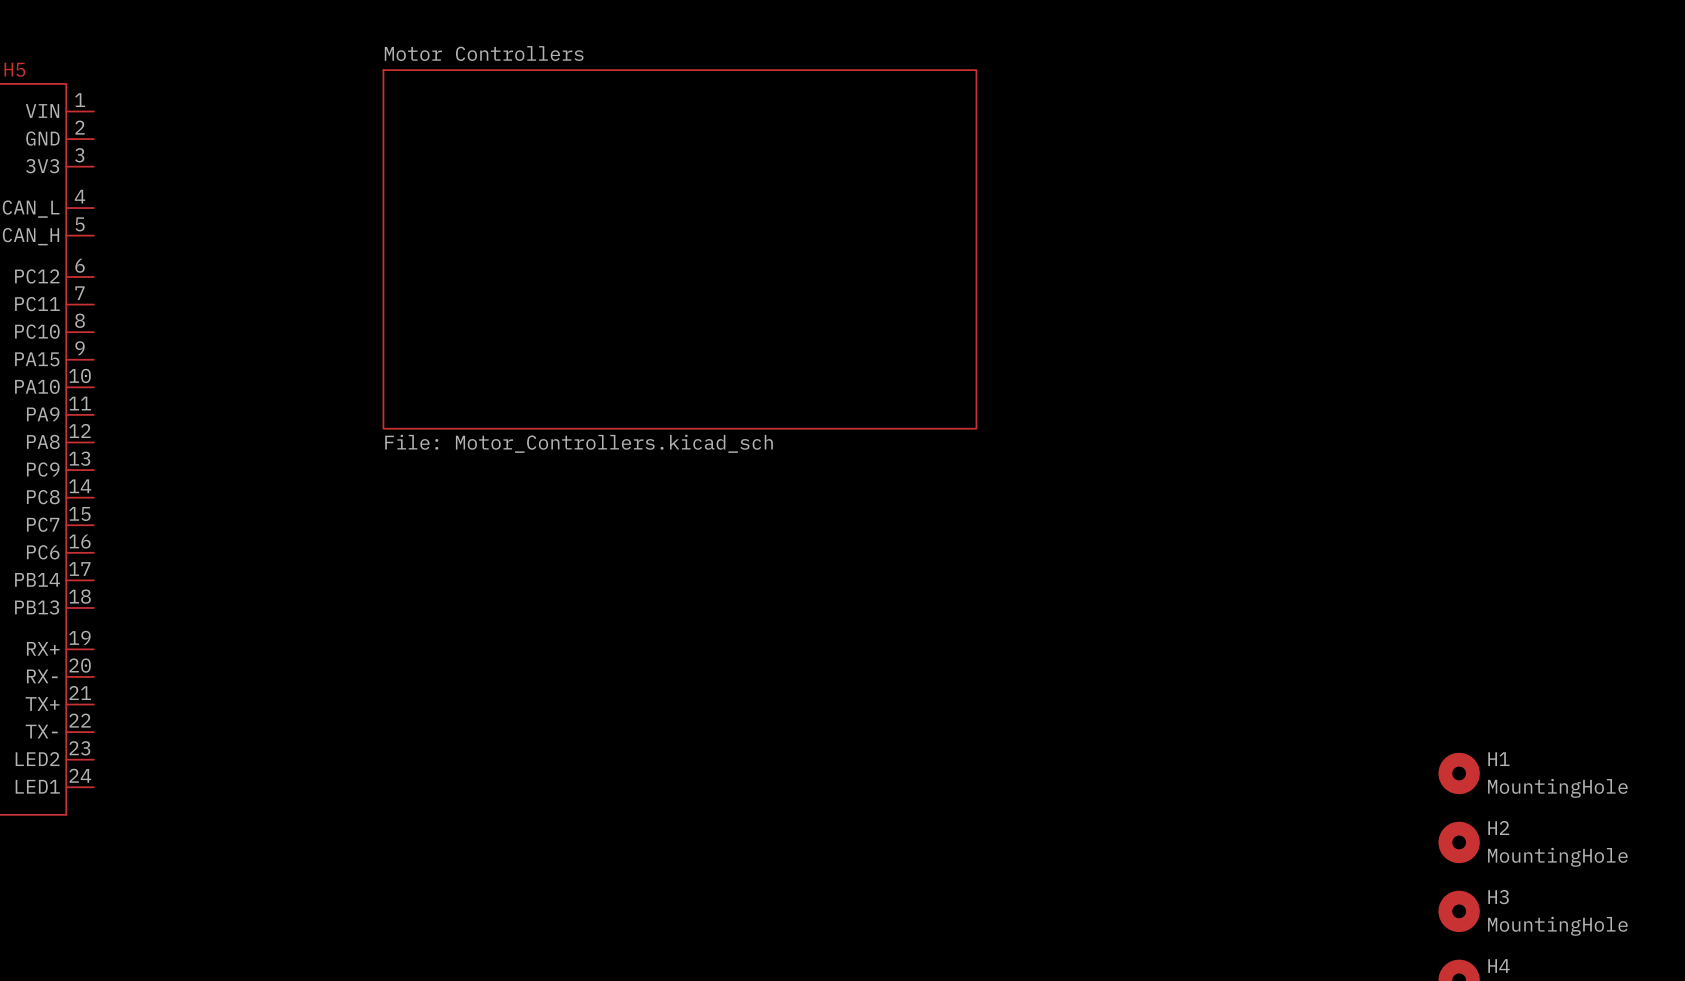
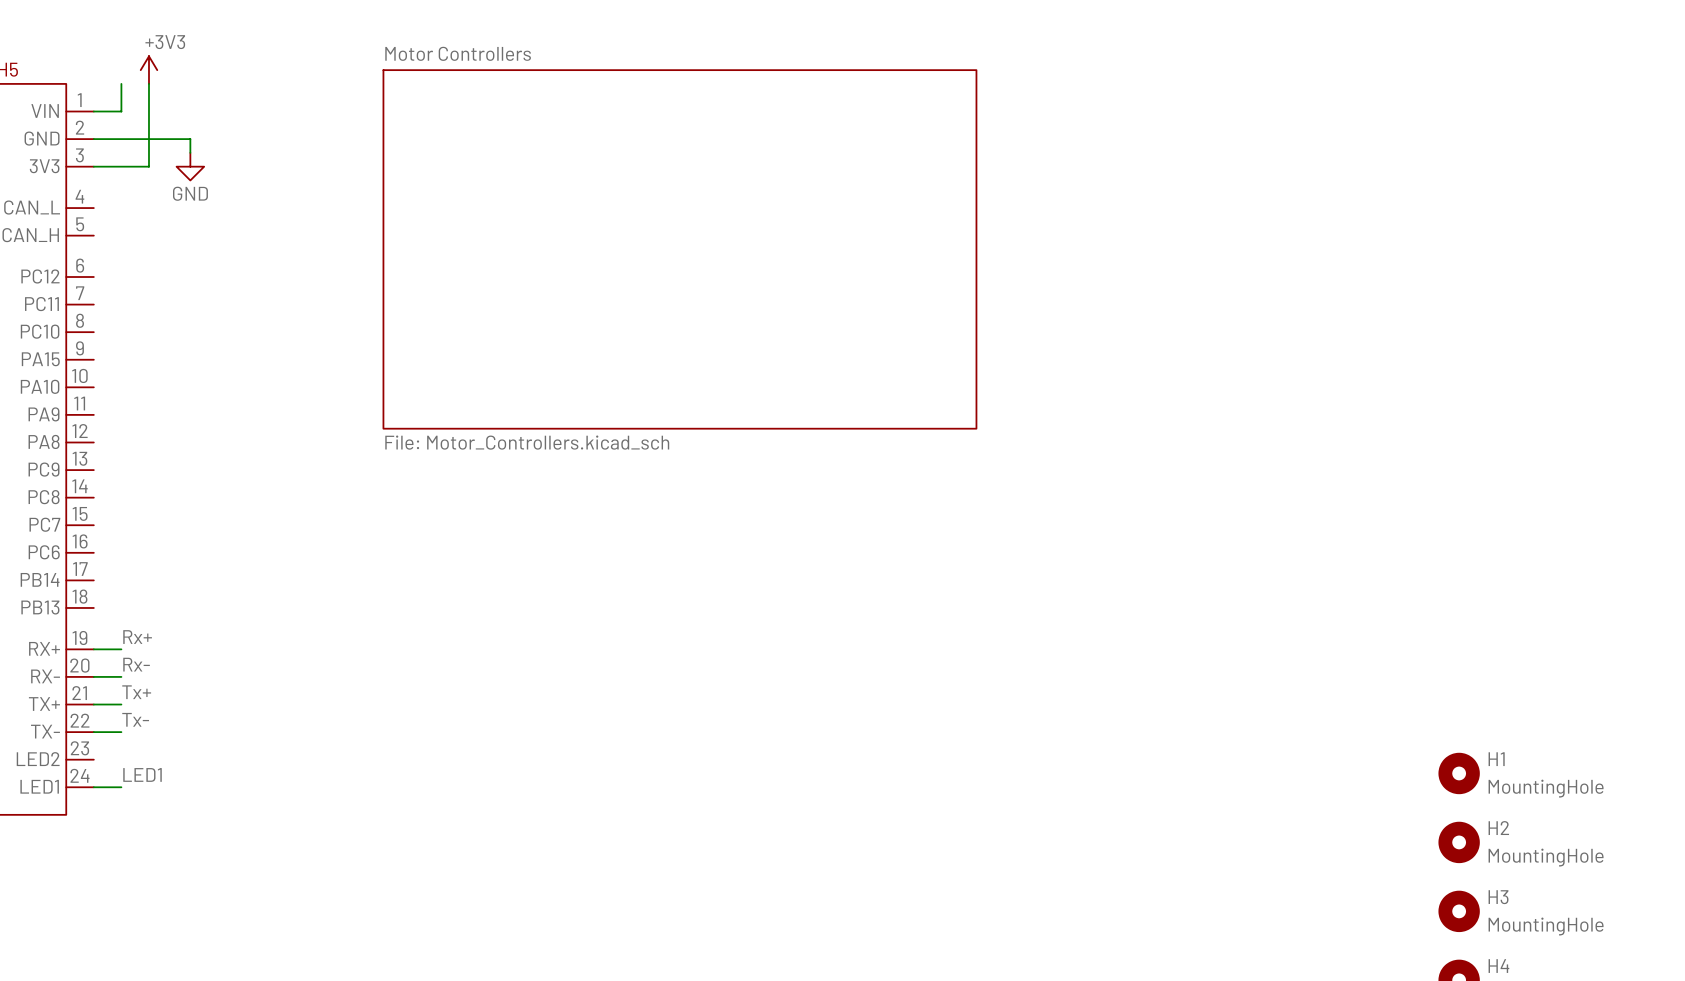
power symbol: none -> +3V3 (148, 70)
wire: none -> (121, 83) (121, 111) (93, 111)
wire: none -> (148, 83) (148, 166) (93, 166)
wire: none -> (93, 139) (190, 139) (190, 152)
power symbol: none -> GND (190, 166)
label: none -> Rx+ (137, 637)
wire: none -> (93, 649) (121, 649)
label: none -> Rx- (136, 664)
wire: none -> (93, 676) (121, 676)
label: none -> Tx+ (136, 692)
wire: none -> (93, 704) (121, 704)
label: none -> Tx- (135, 719)
wire: none -> (93, 732) (121, 732)
label: none -> LED1 (142, 774)
wire: none -> (93, 787) (121, 787)

